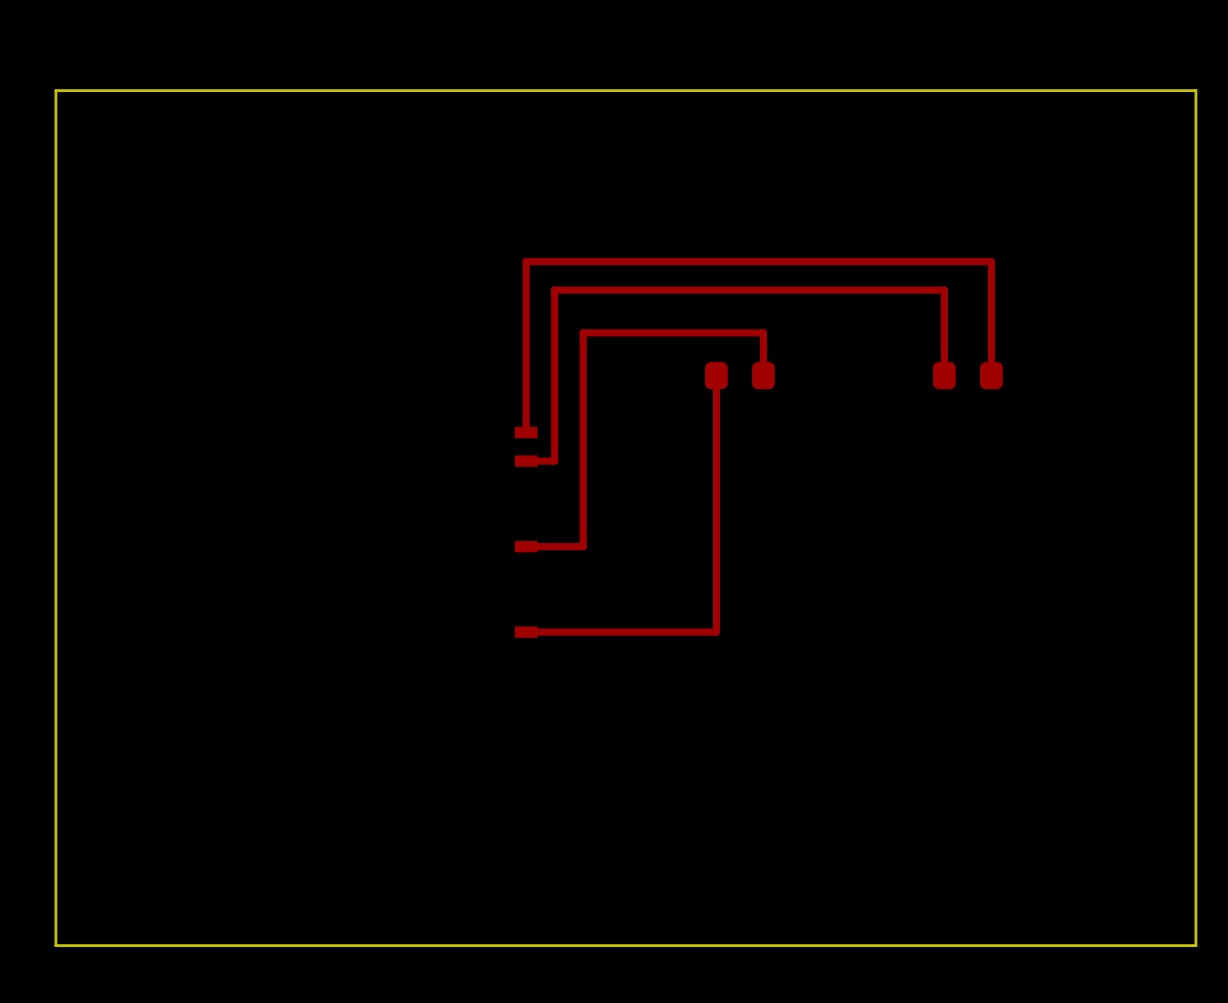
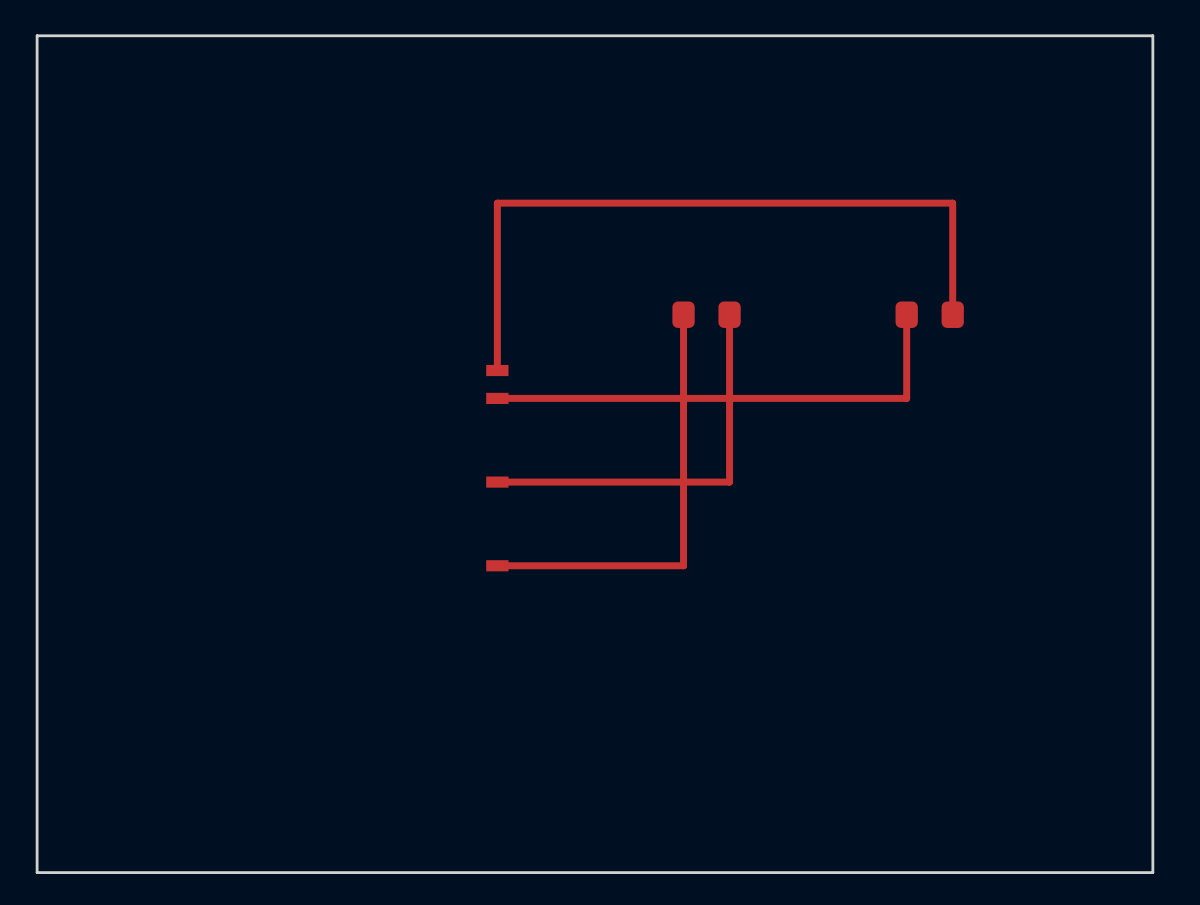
top track: (763, 375) (763, 332) (583, 332) (583, 546) -> (729, 314) (729, 482) (553, 482)
top track: (944, 375) (944, 290) (554, 290) (554, 461) -> (906, 314) (906, 398) (525, 398)

